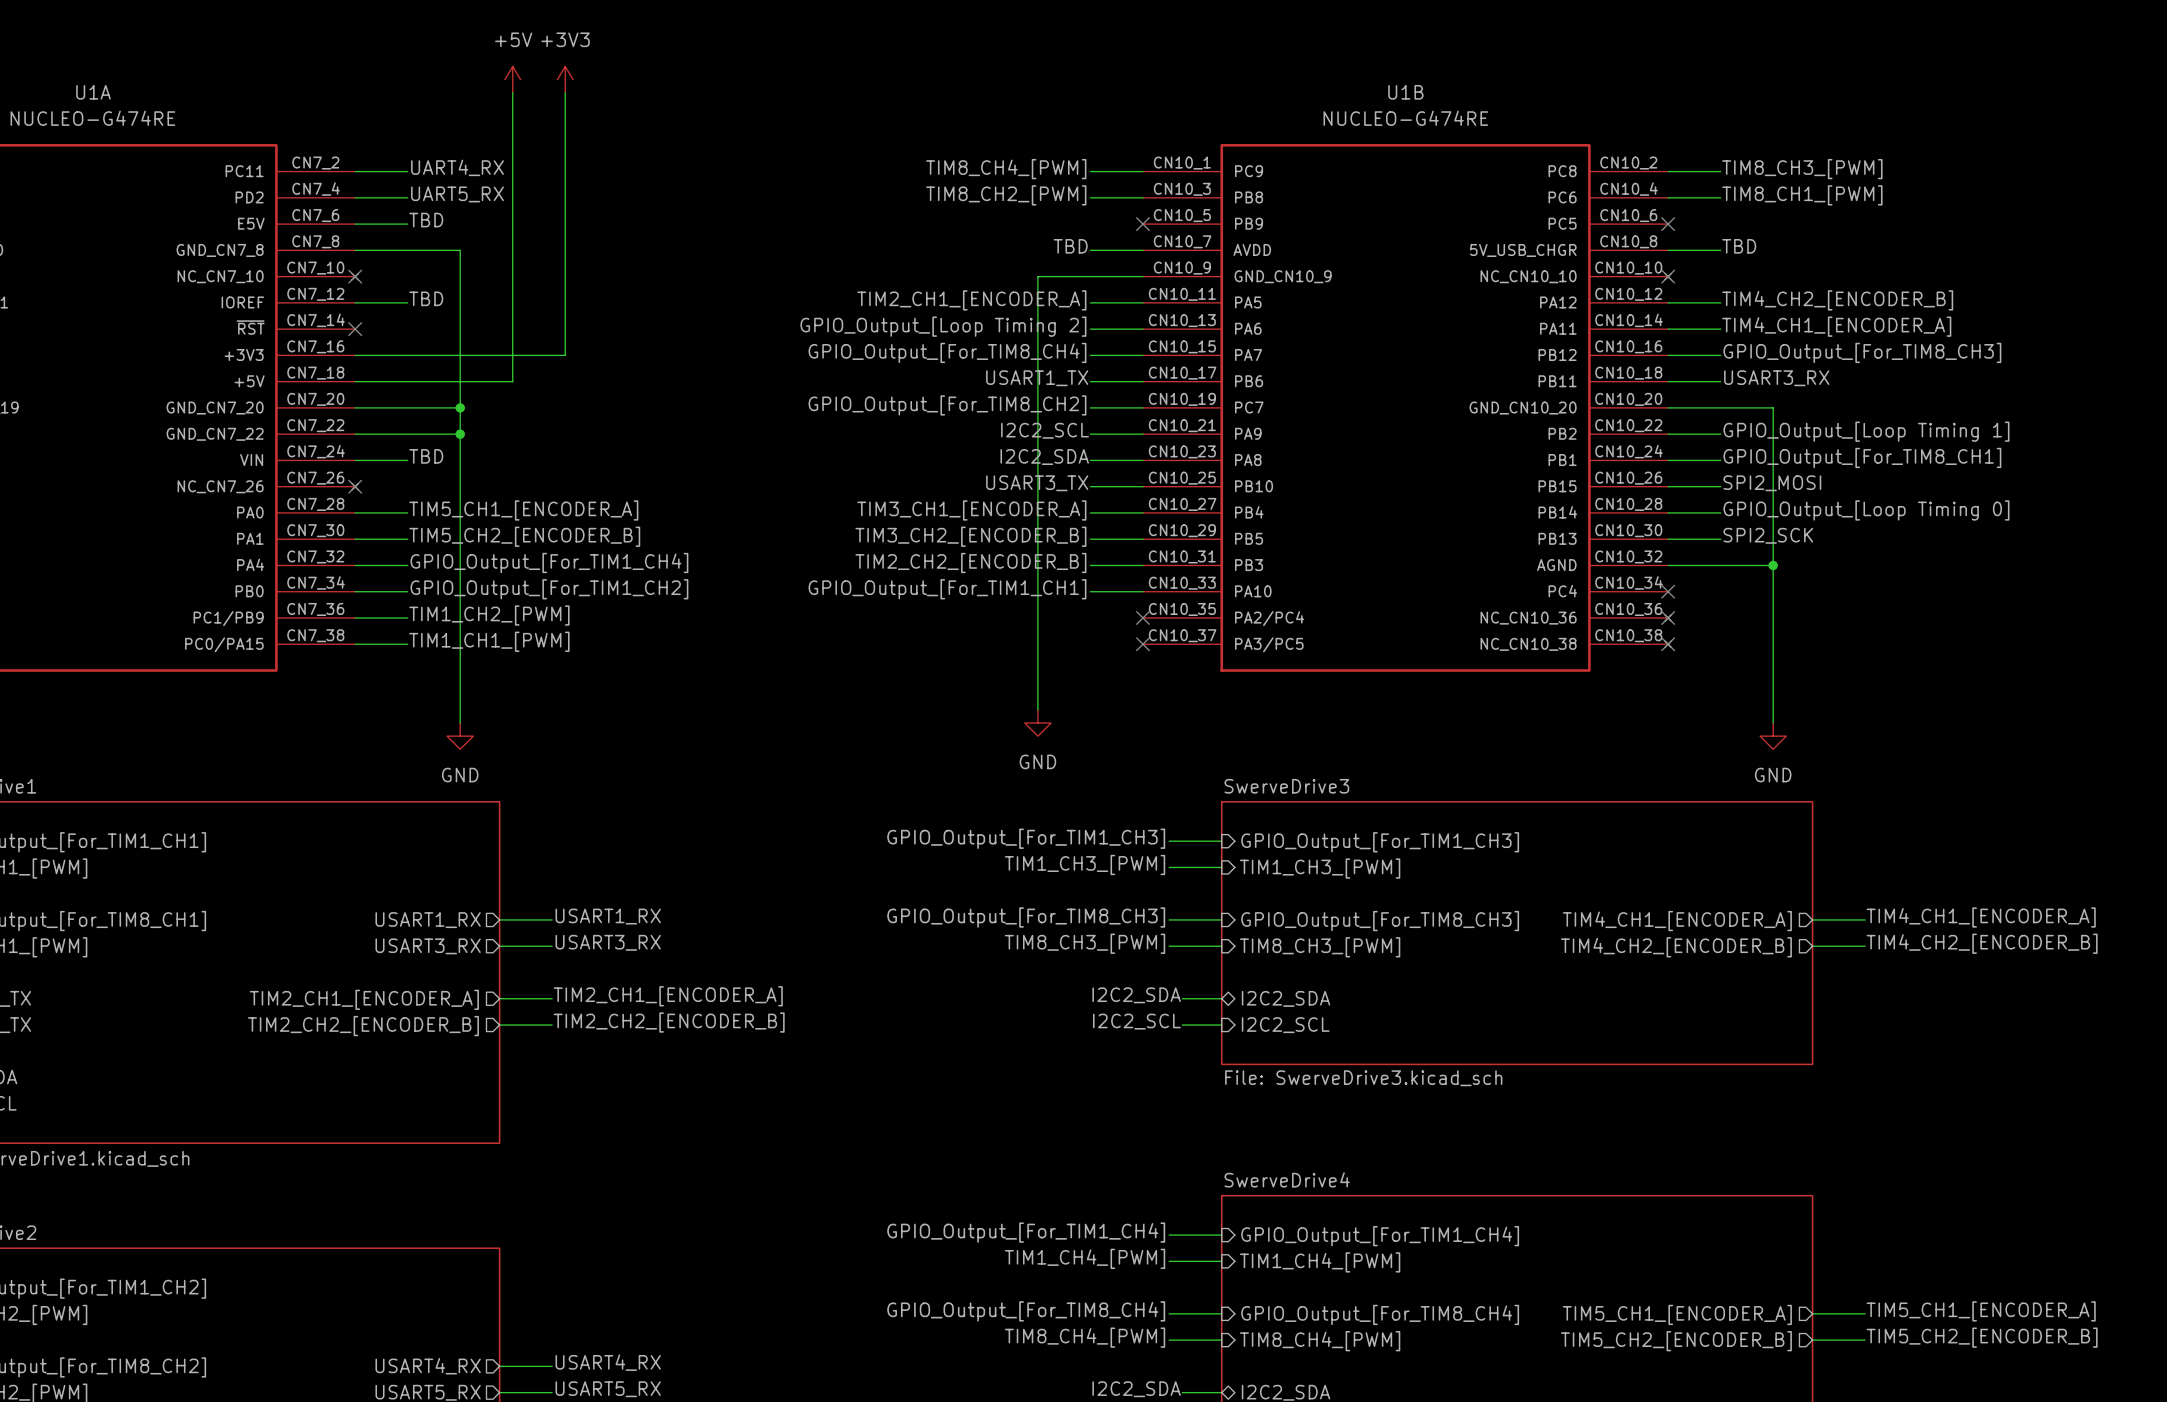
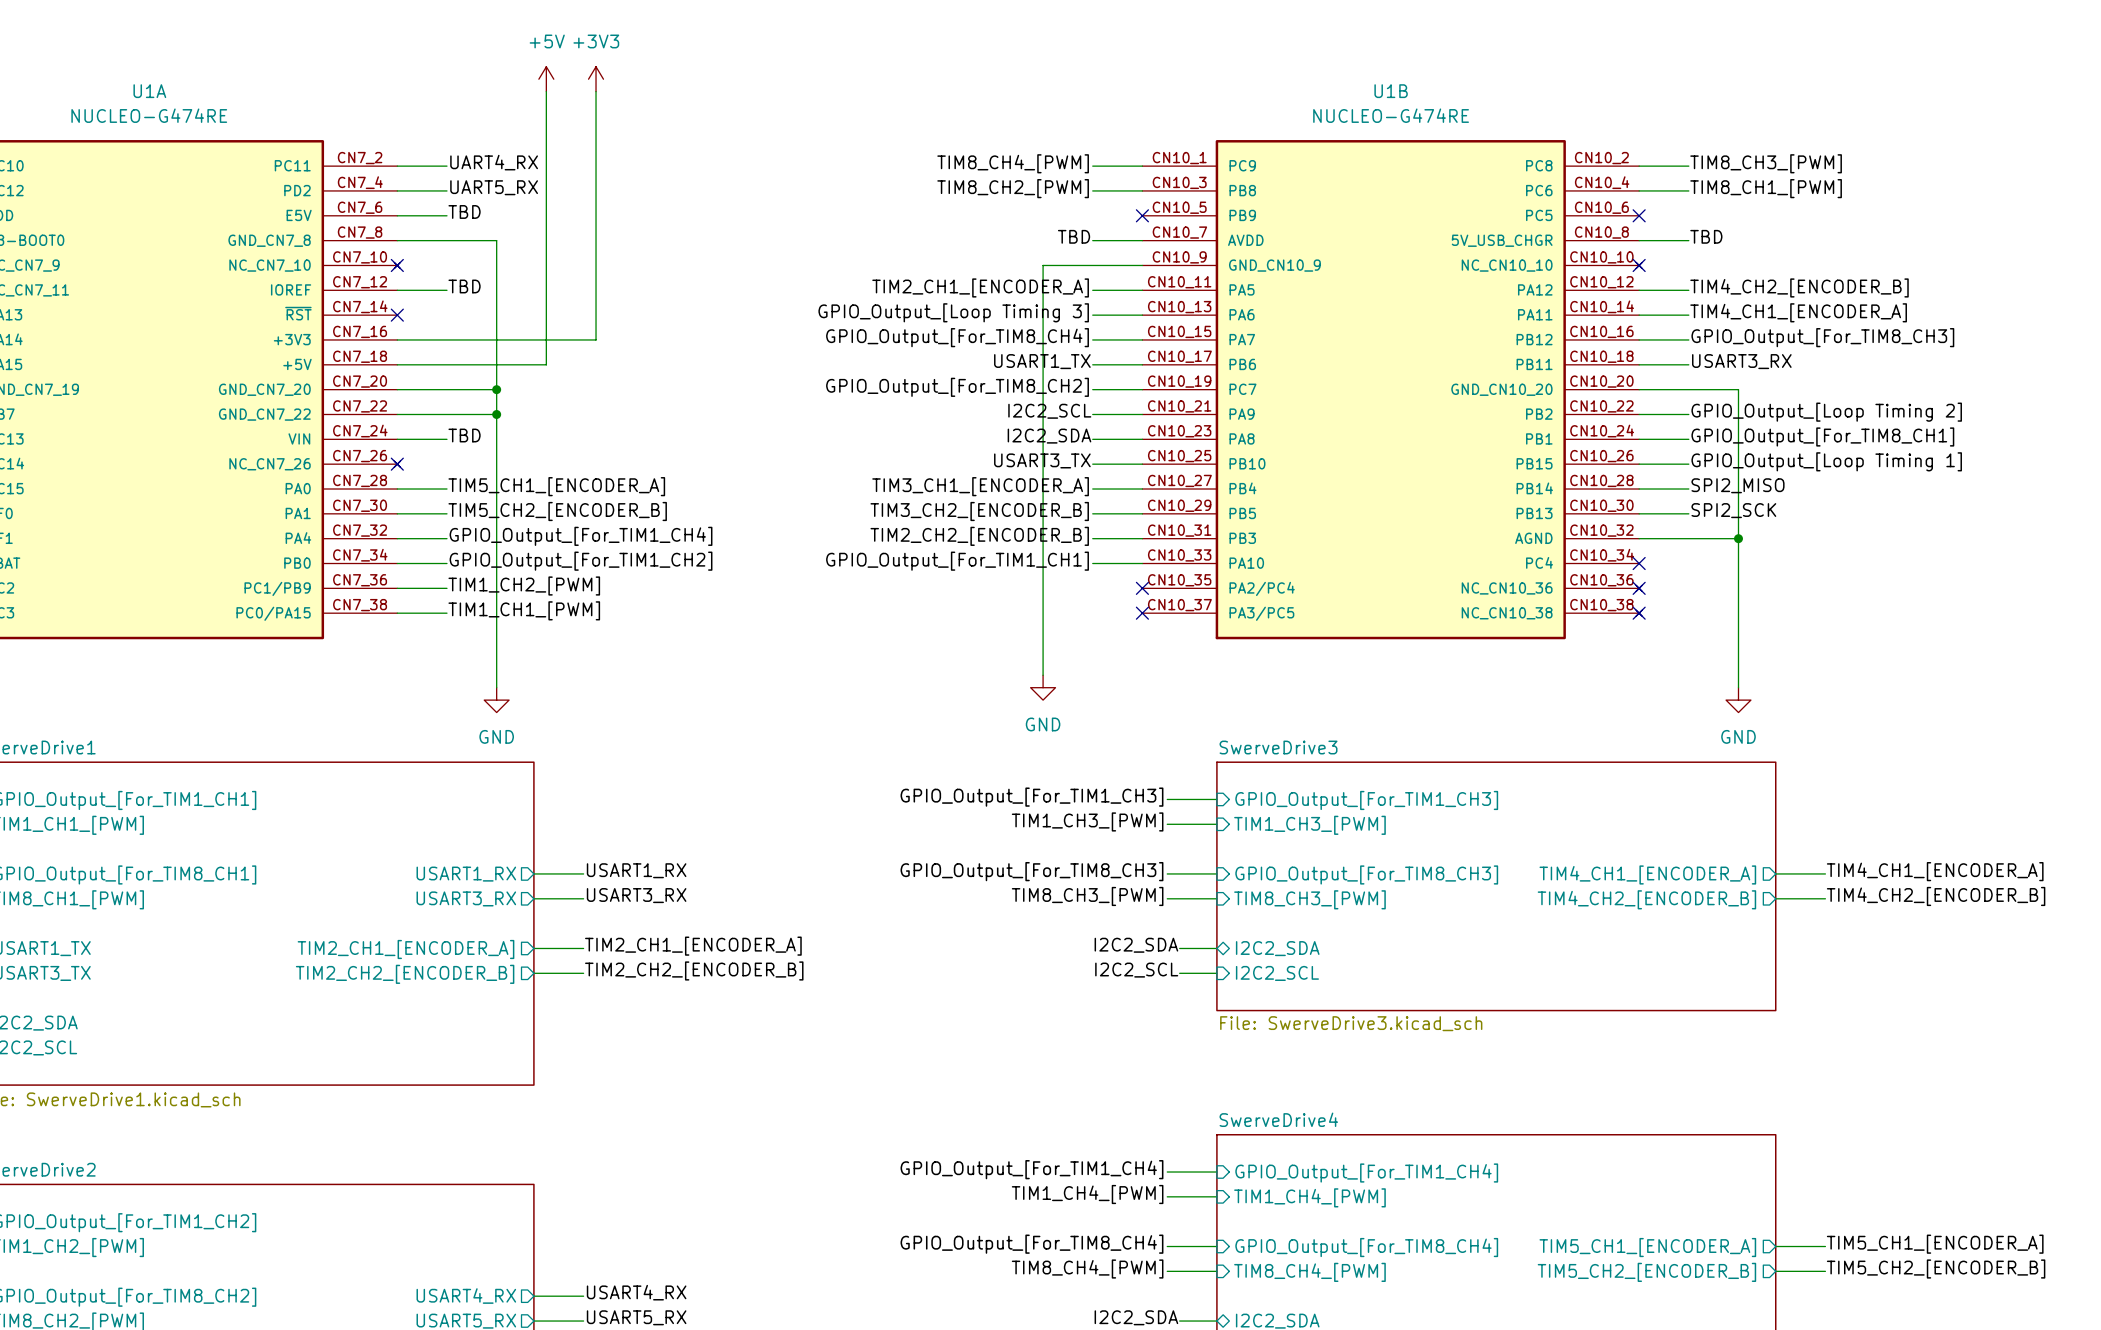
label: GPIO_Output_[Loop Timing 2] (943, 326) -> GPIO_Output_[Loop Timing 3] (953, 312)
label: GPIO_Output_[Loop Timing 1] (1866, 431) -> GPIO_Output_[Loop Timing 2] (1826, 412)
label: SPI2_MOSI (1772, 483) -> GPIO_Output_[Loop Timing 1] (1826, 461)
label: GPIO_Output_[Loop Timing 0] (1866, 510) -> SPI2_MISO (1737, 485)

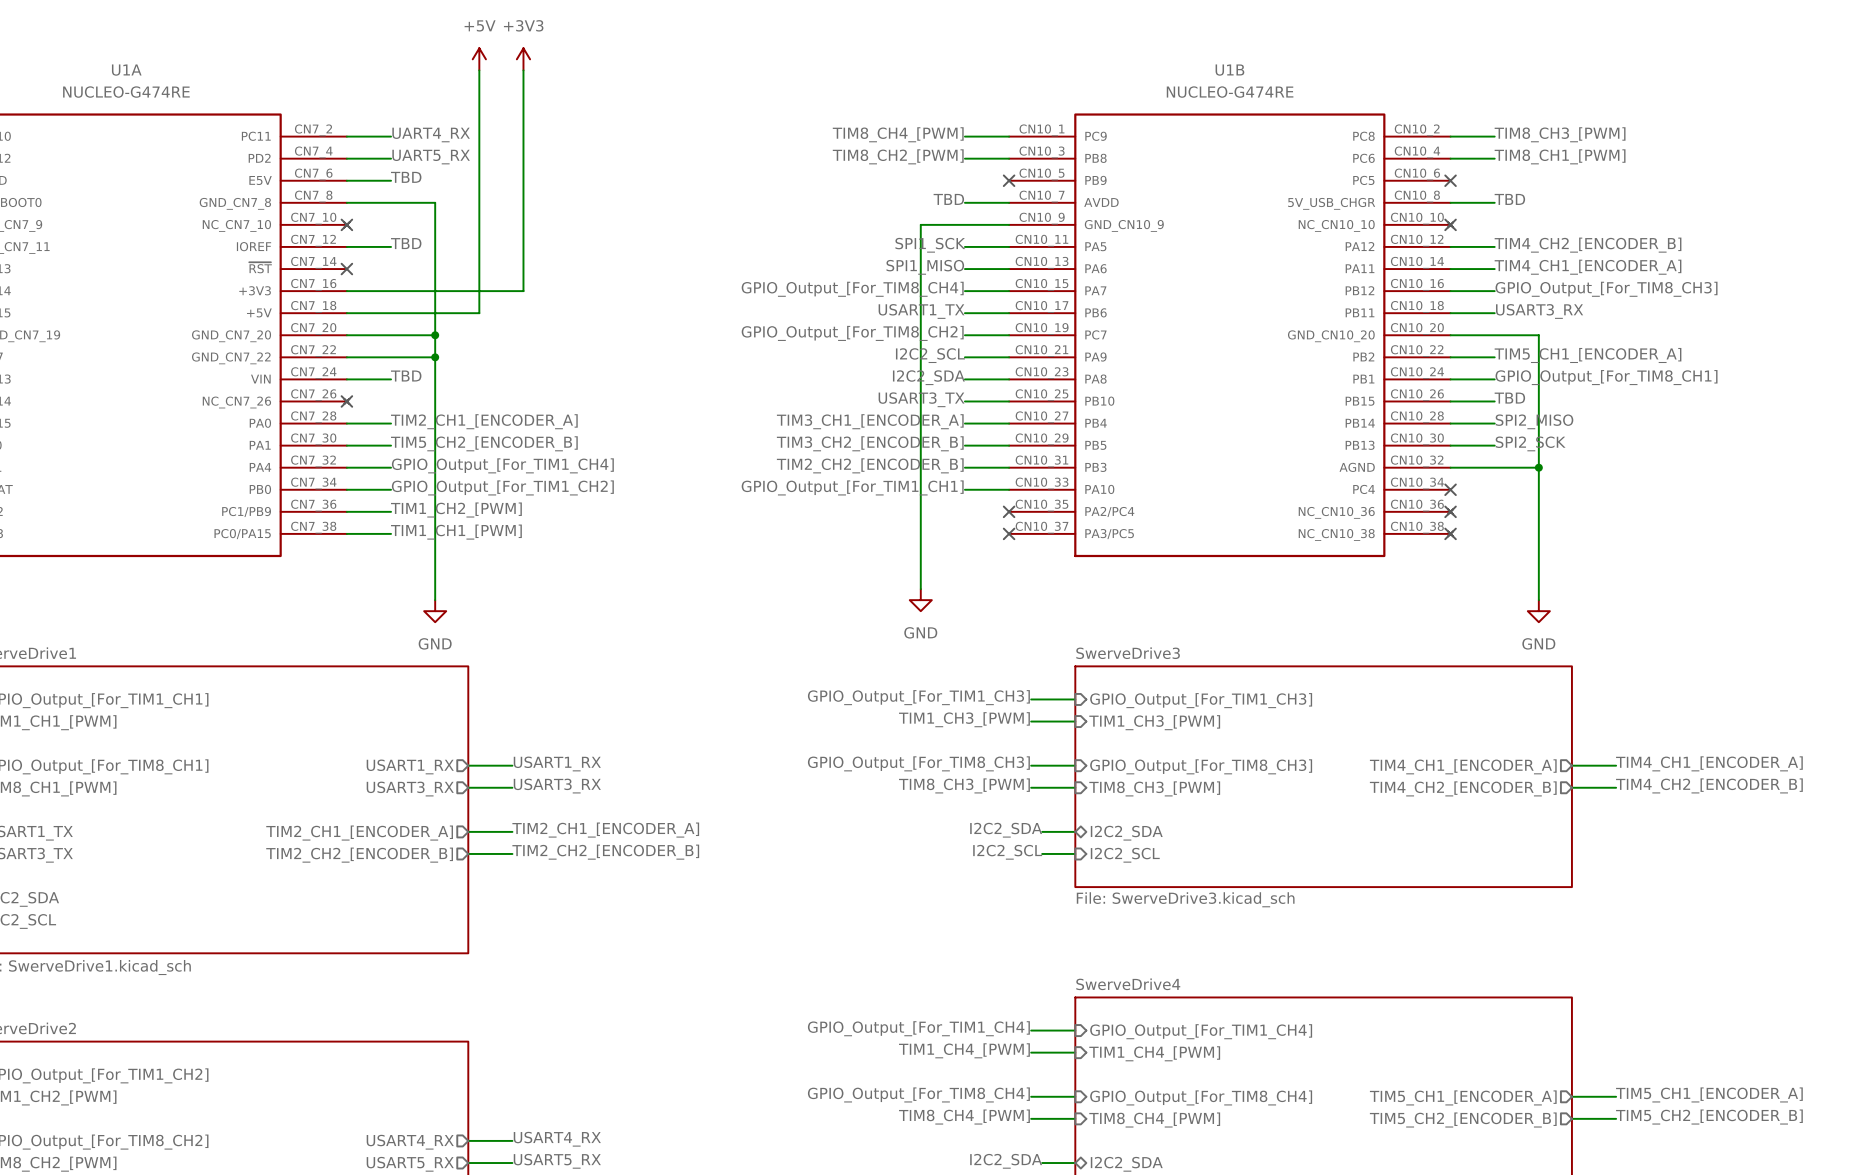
label: TIM2_CH1_[ENCODER_A] (980, 287) -> SPI1_SCK (930, 245)
label: GPIO_Output_[Loop Timing 3] (953, 312) -> SPI1_MISO (925, 267)
label: GPIO_Output_[Loop Timing 2] (1826, 412) -> TIM5_CH1_[ENCODER_A] (1588, 355)
label: GPIO_Output_[Loop Timing 1] (1826, 461) -> TBD (1509, 398)
label: TIM5_CH1_[ENCODER_A] (556, 486) -> TIM2_CH1_[ENCODER_A] (484, 421)

